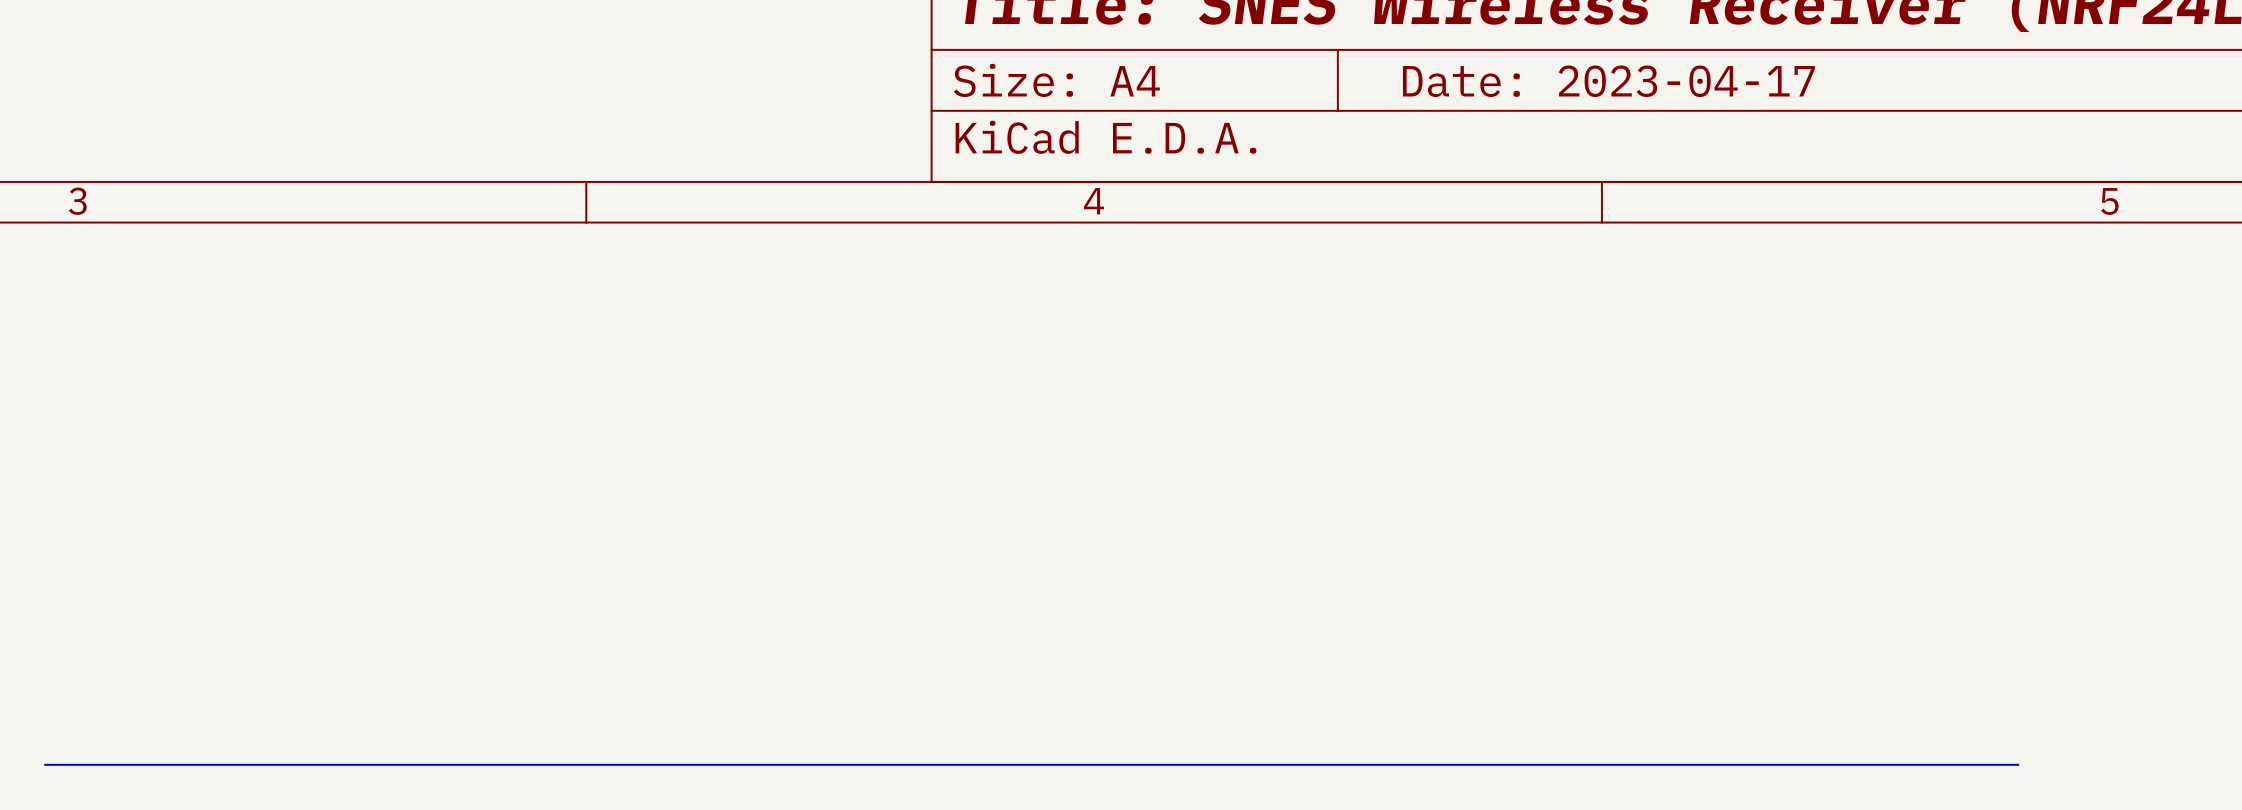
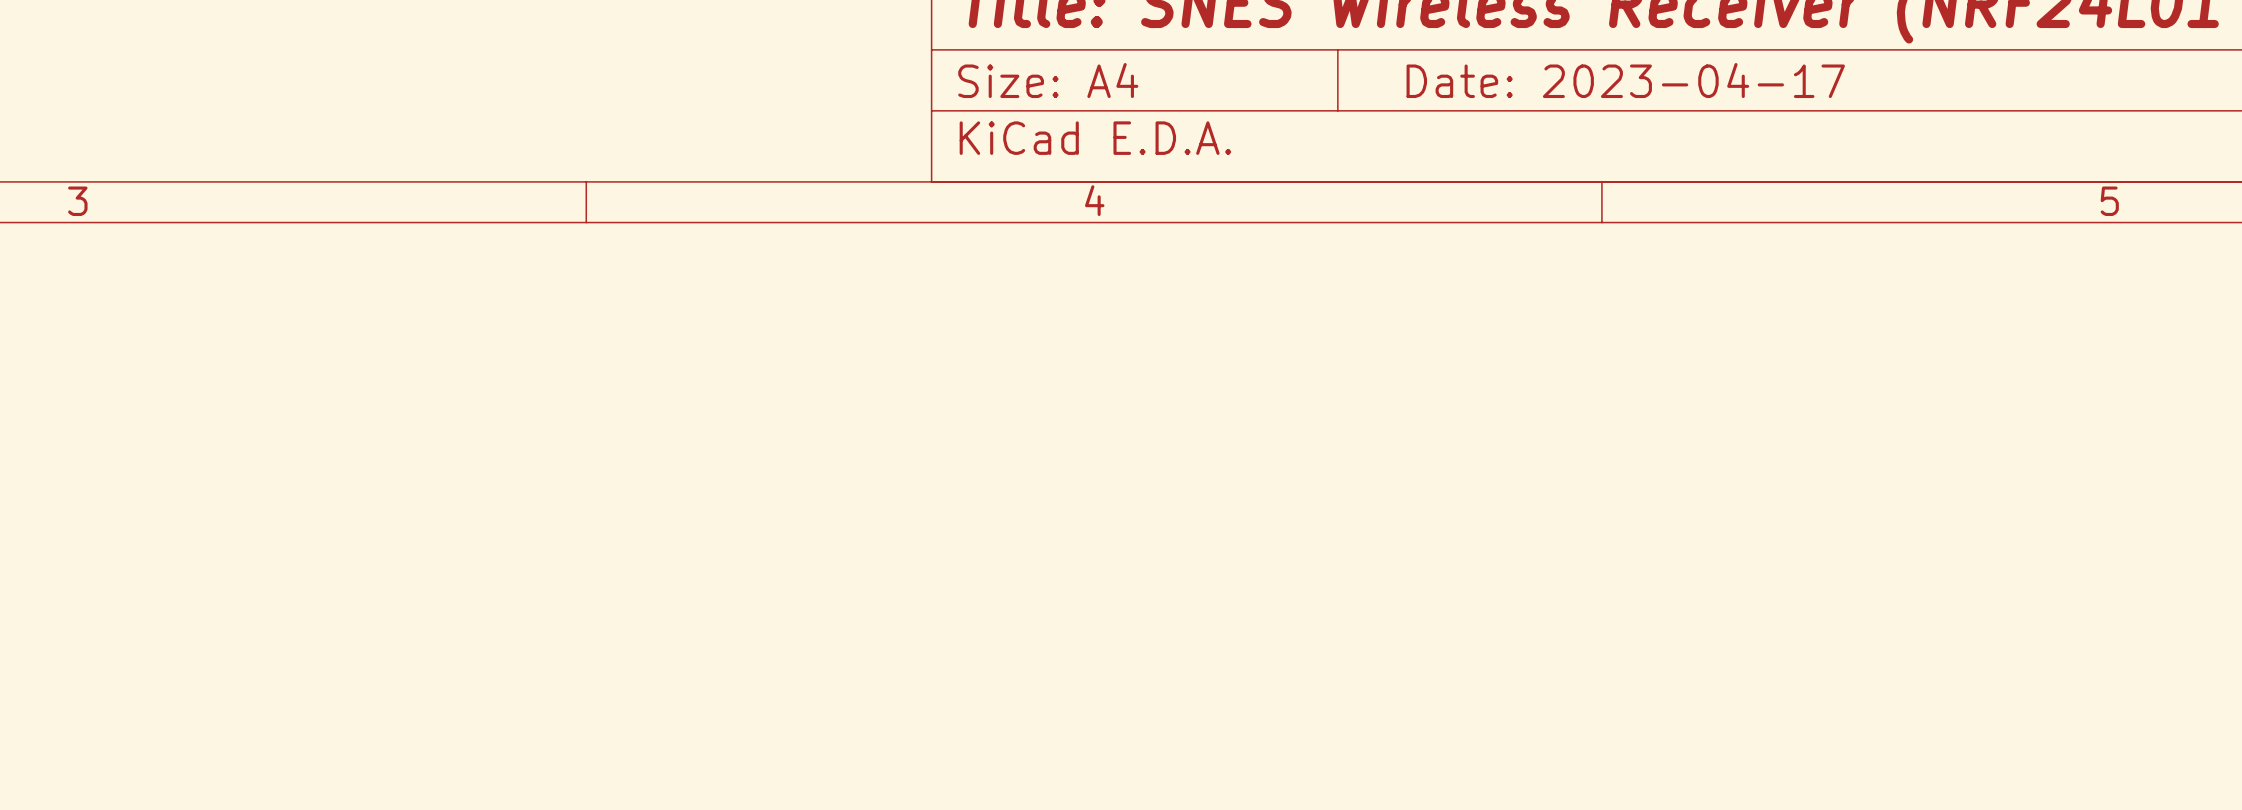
line: (44, 764) (2018, 764) -> none

